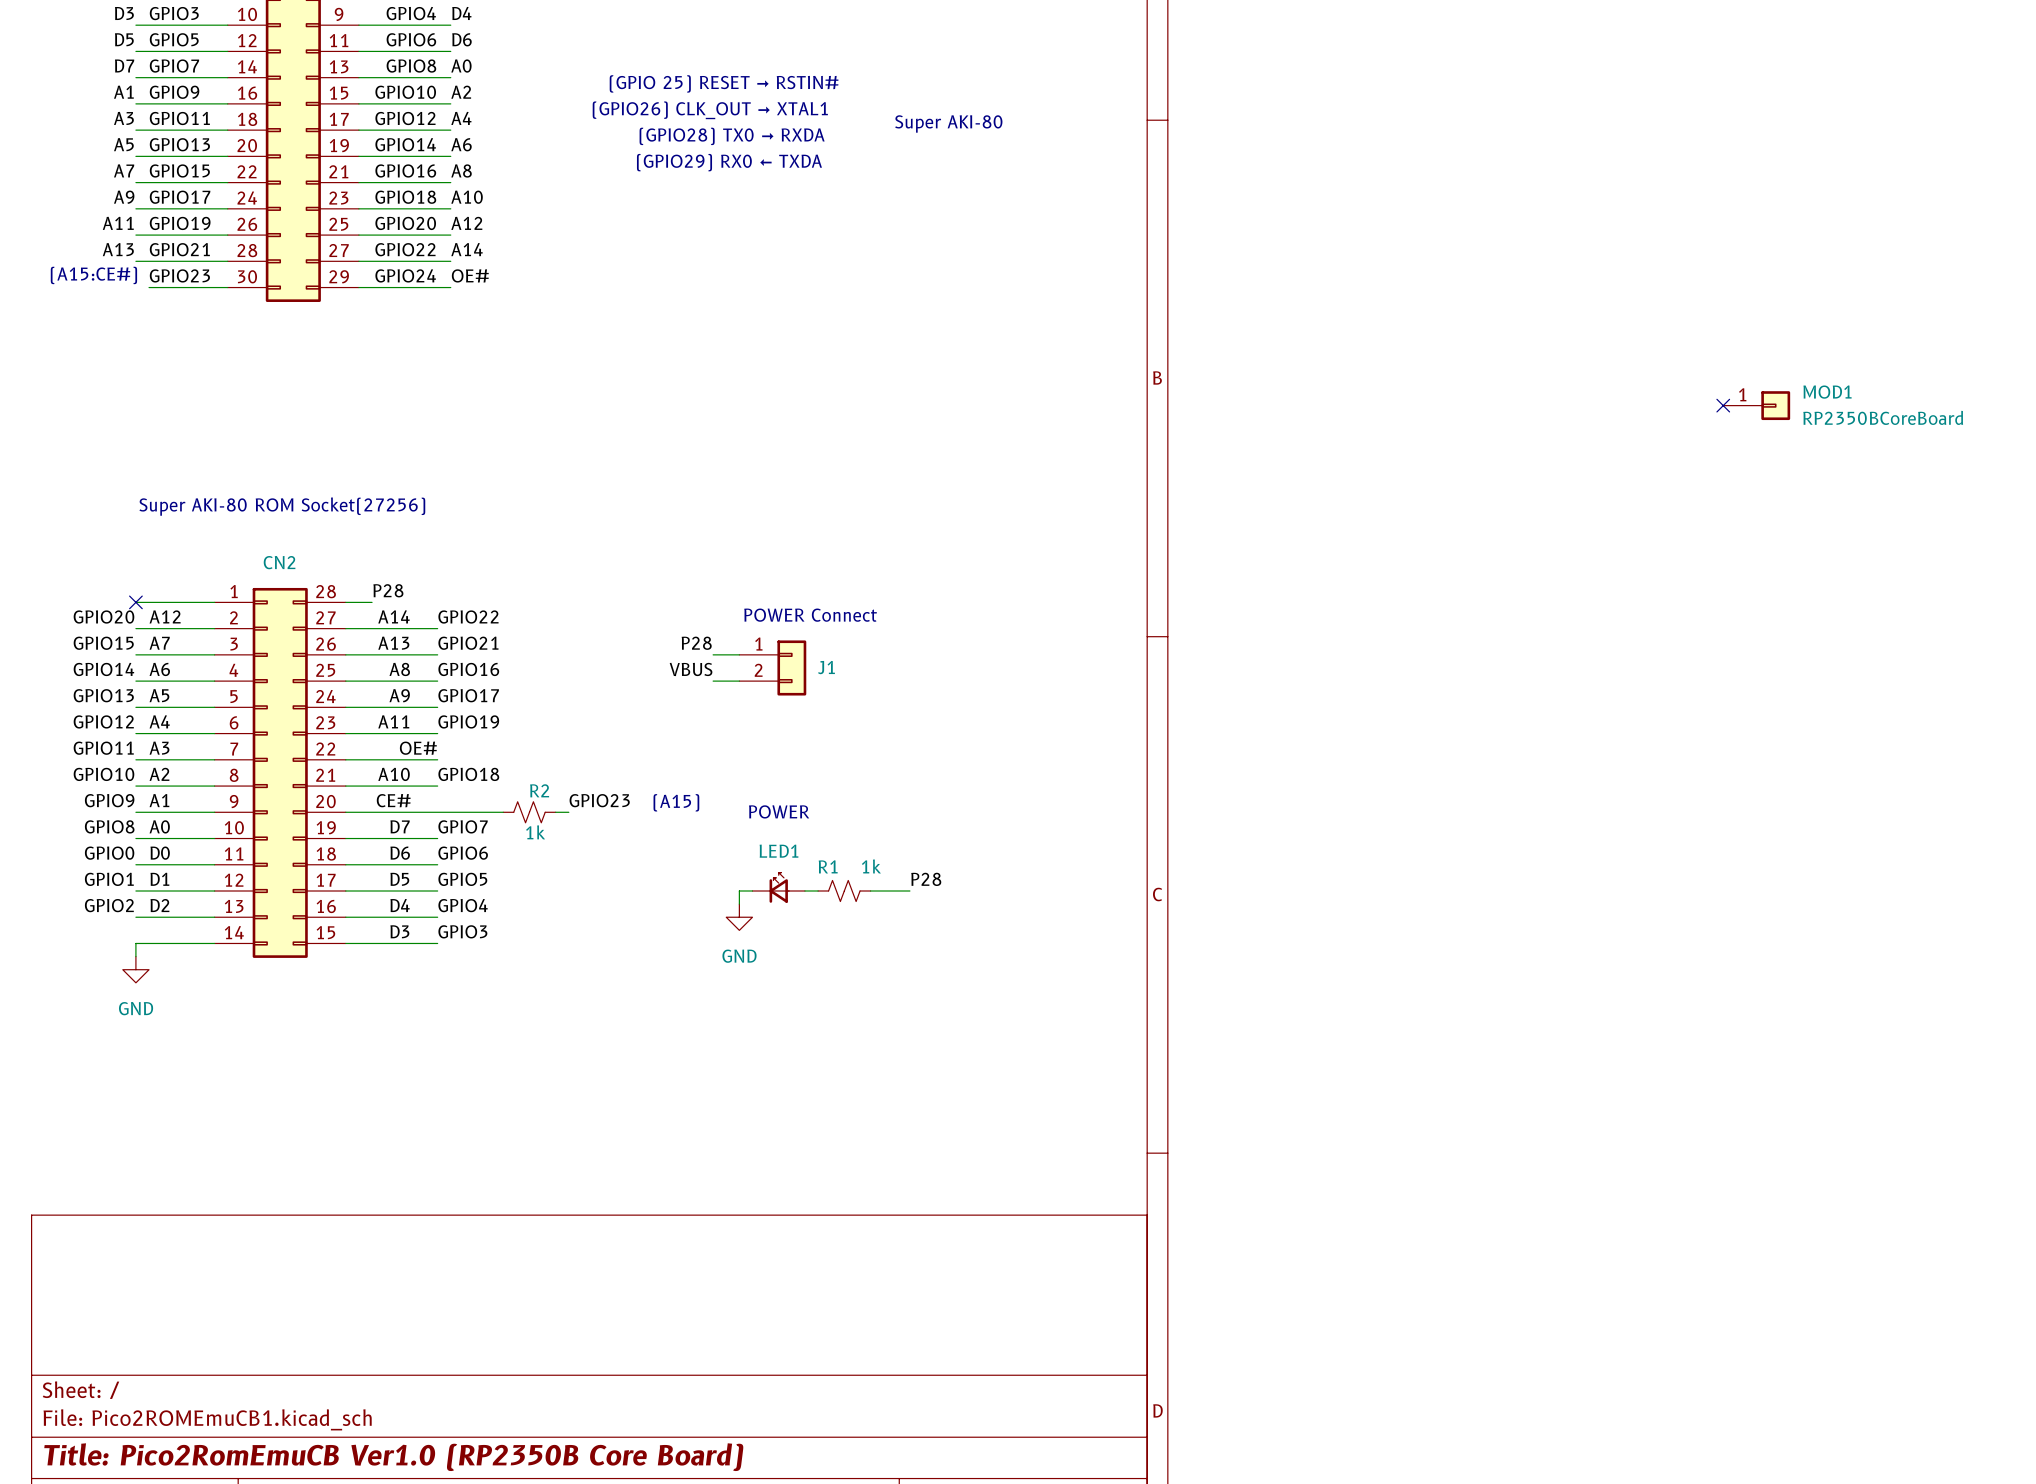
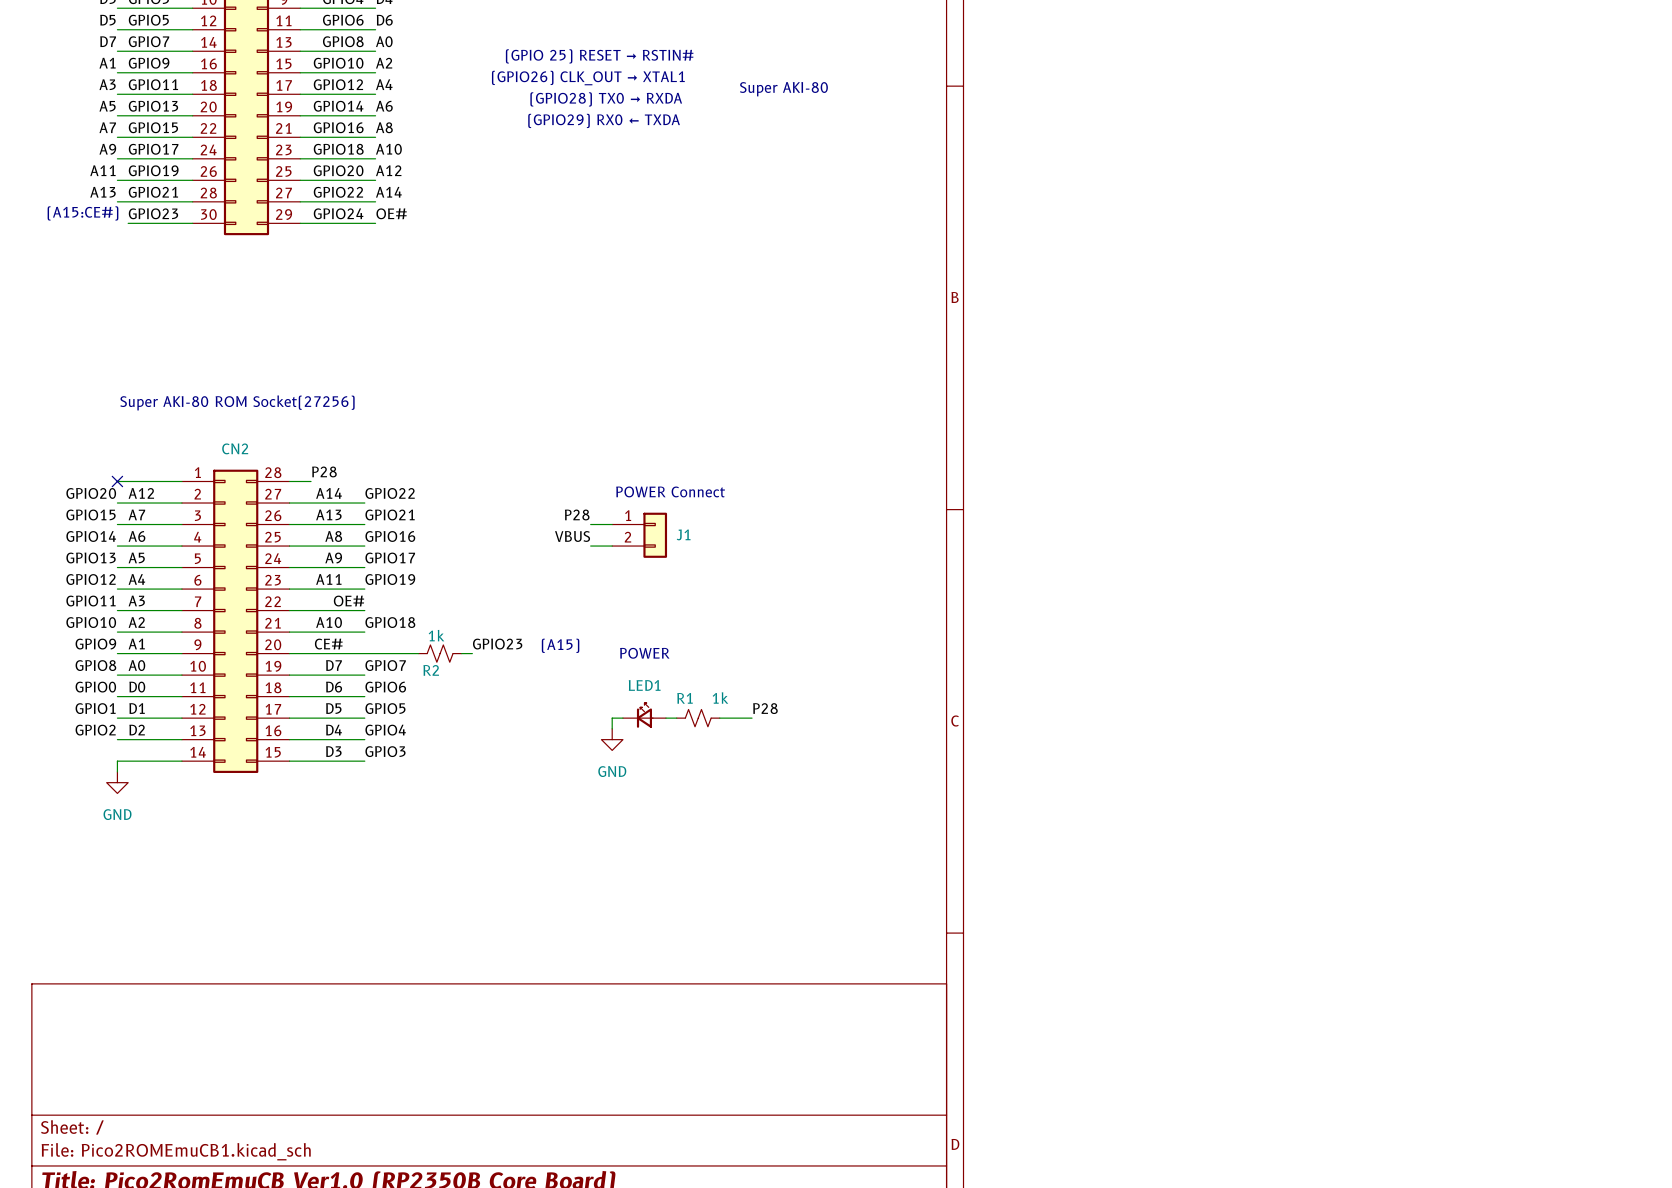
no-connect mark: (1723, 405) -> none
MOD1: RP2350BCoreBoard (1756, 405) -> none
R2 name position: R2 (539, 790) -> R2 (431, 670)
R2 value position: 1k (535, 832) -> 1k (436, 635)

